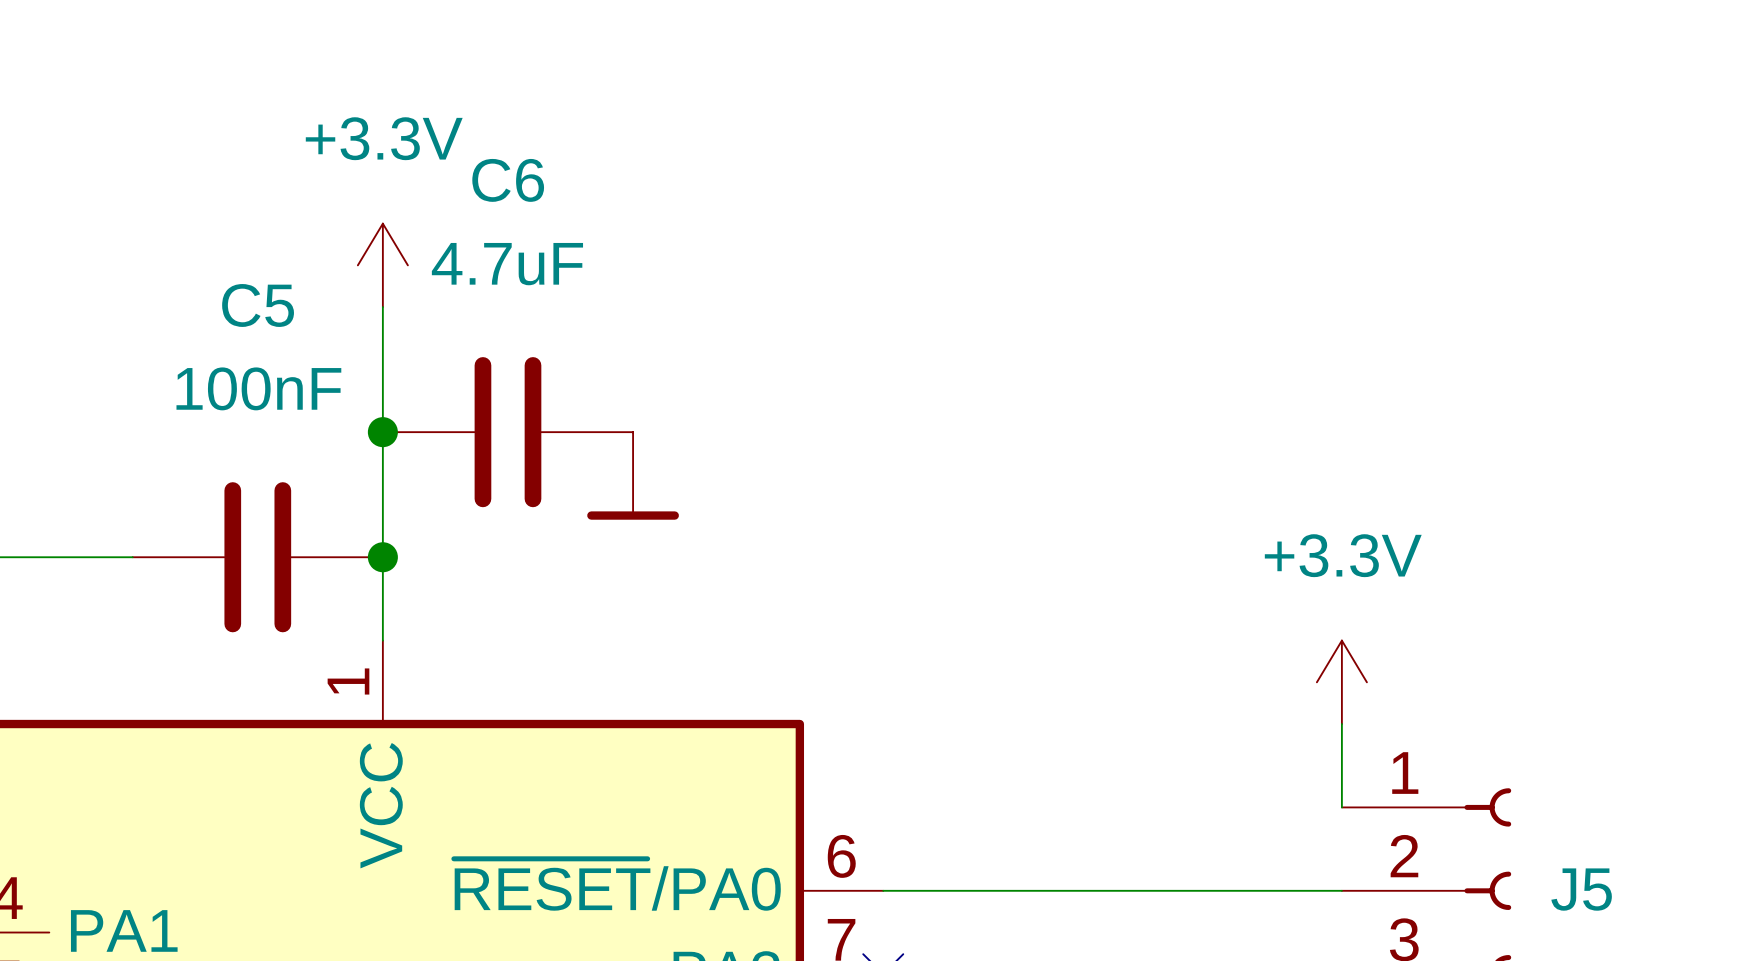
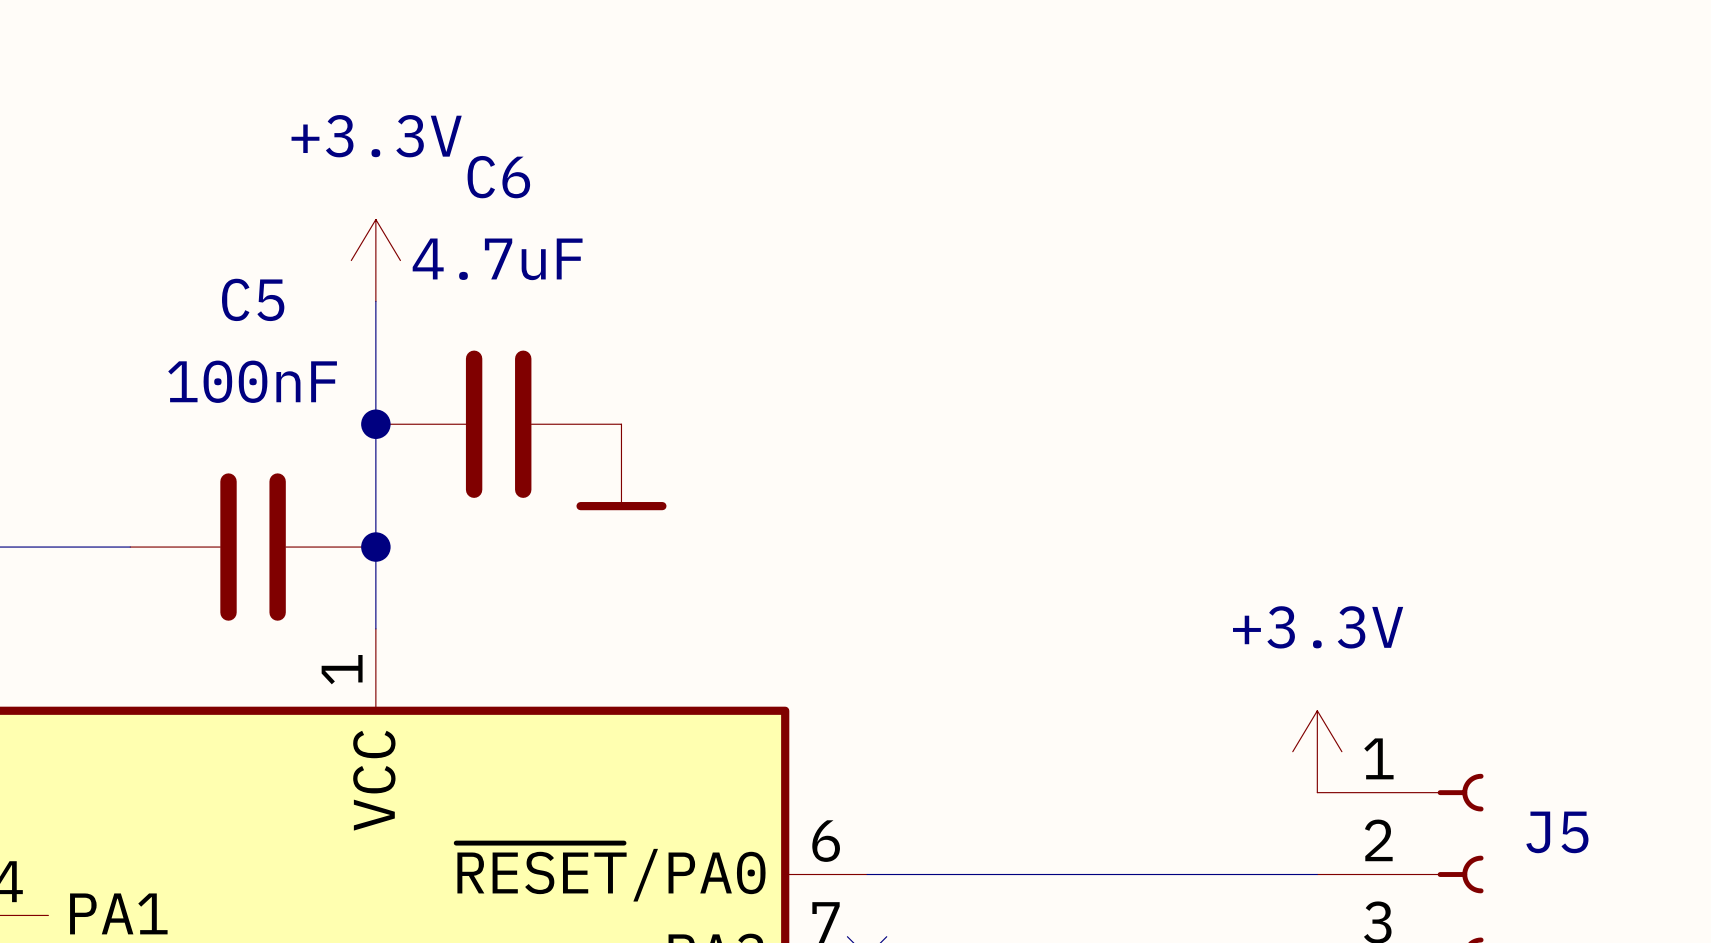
power symbol position: +3.3V (1341, 682) -> +3.3V (1317, 751)
J5 name position: J5 (1581, 889) -> J5 (1557, 832)

